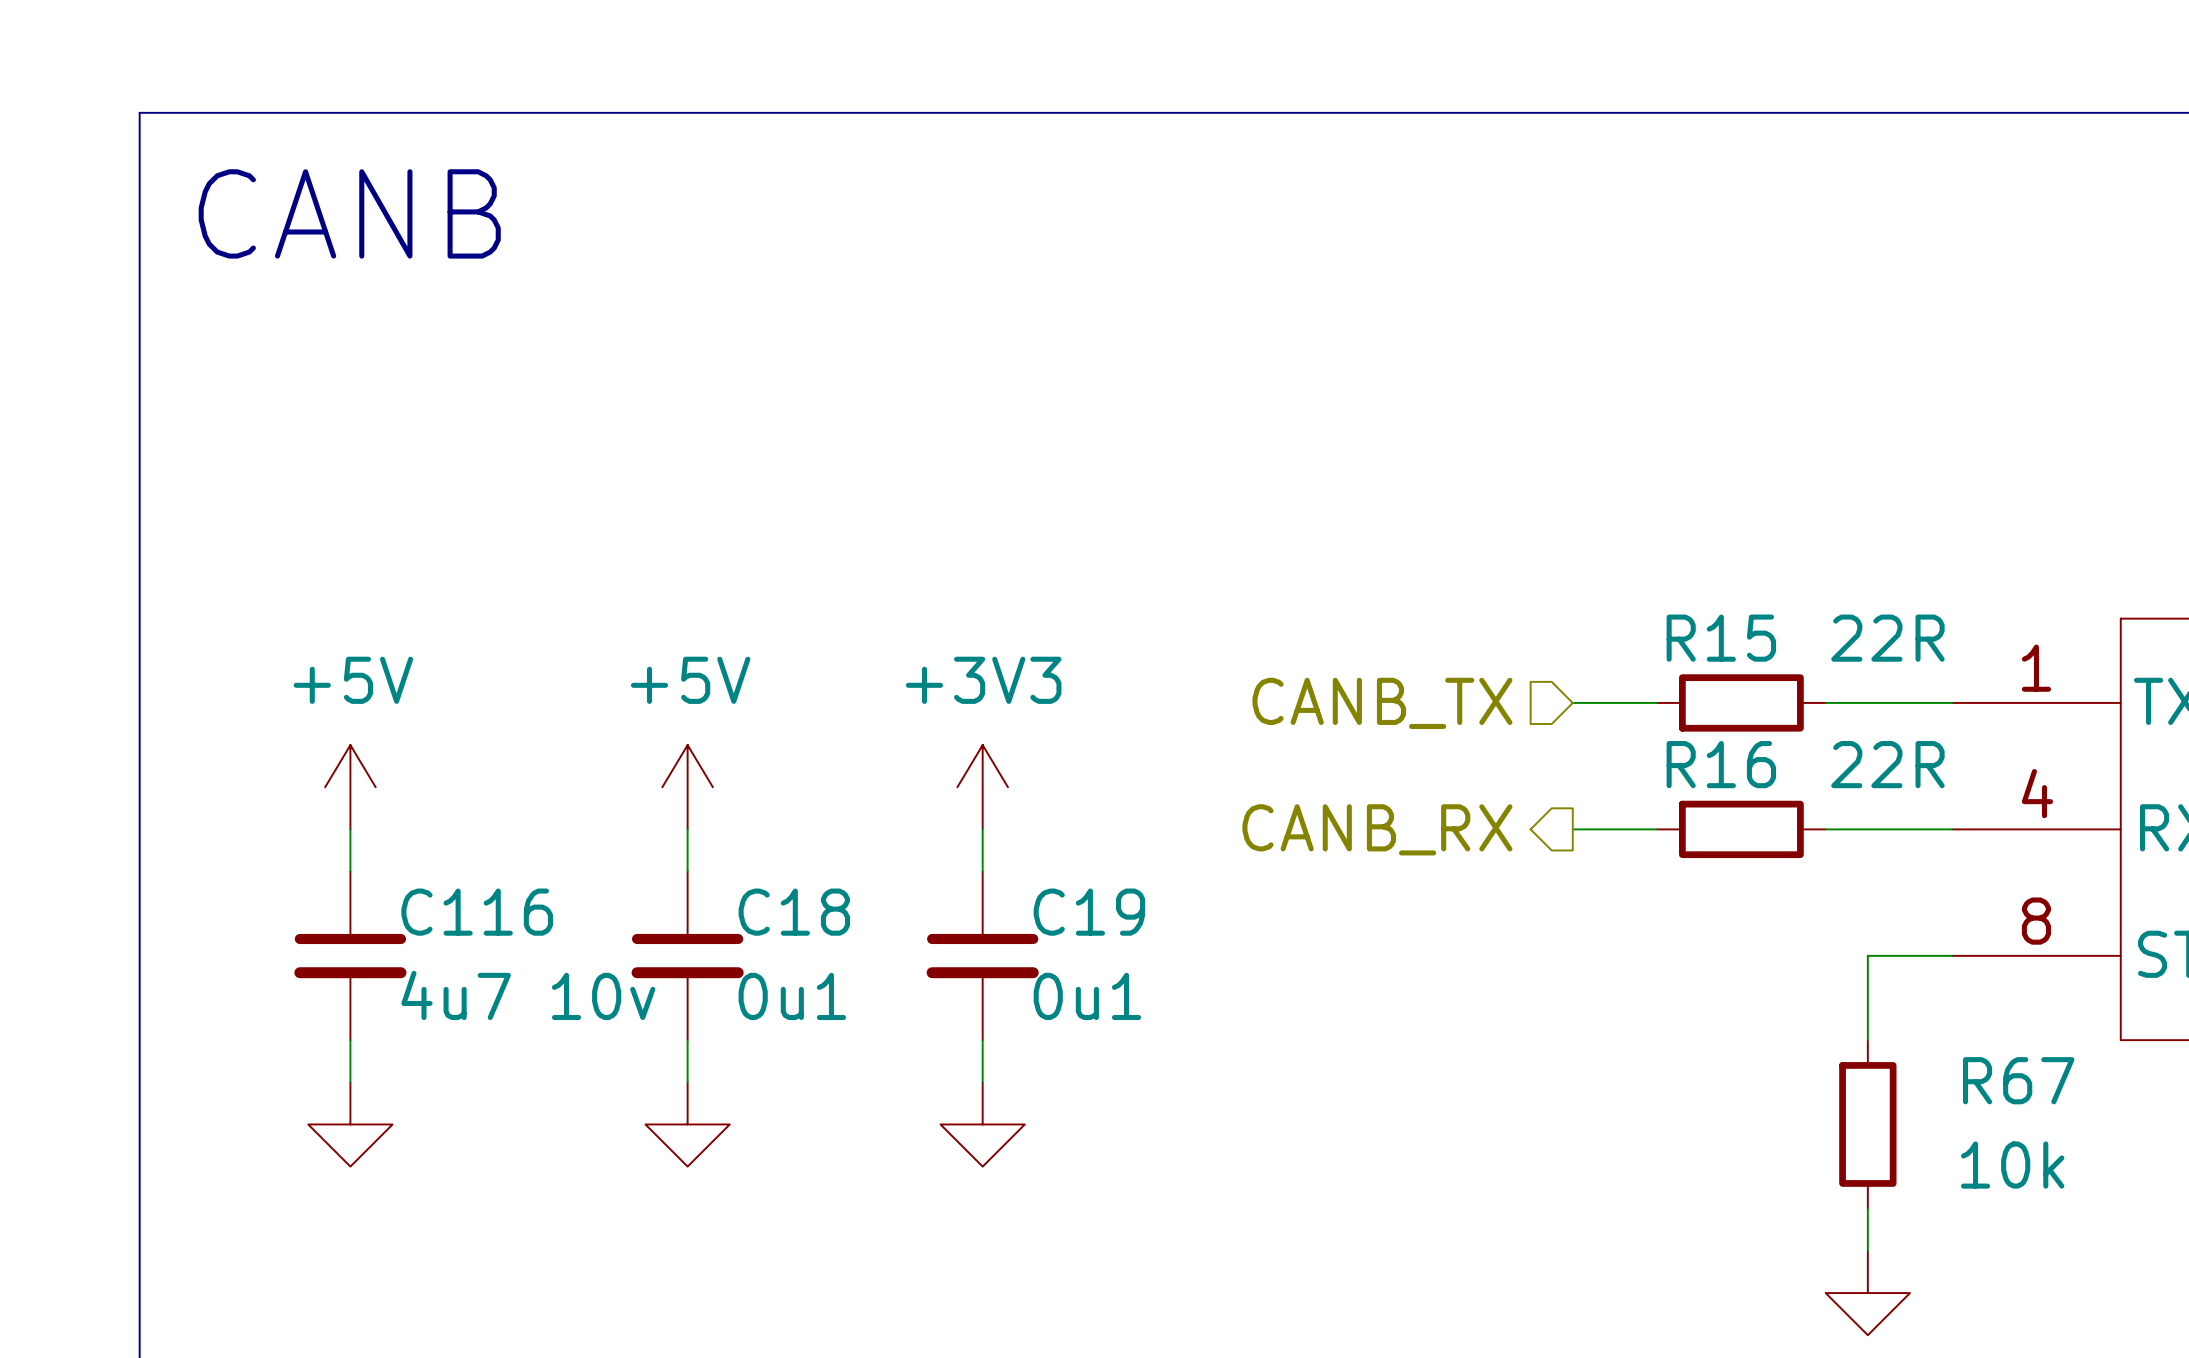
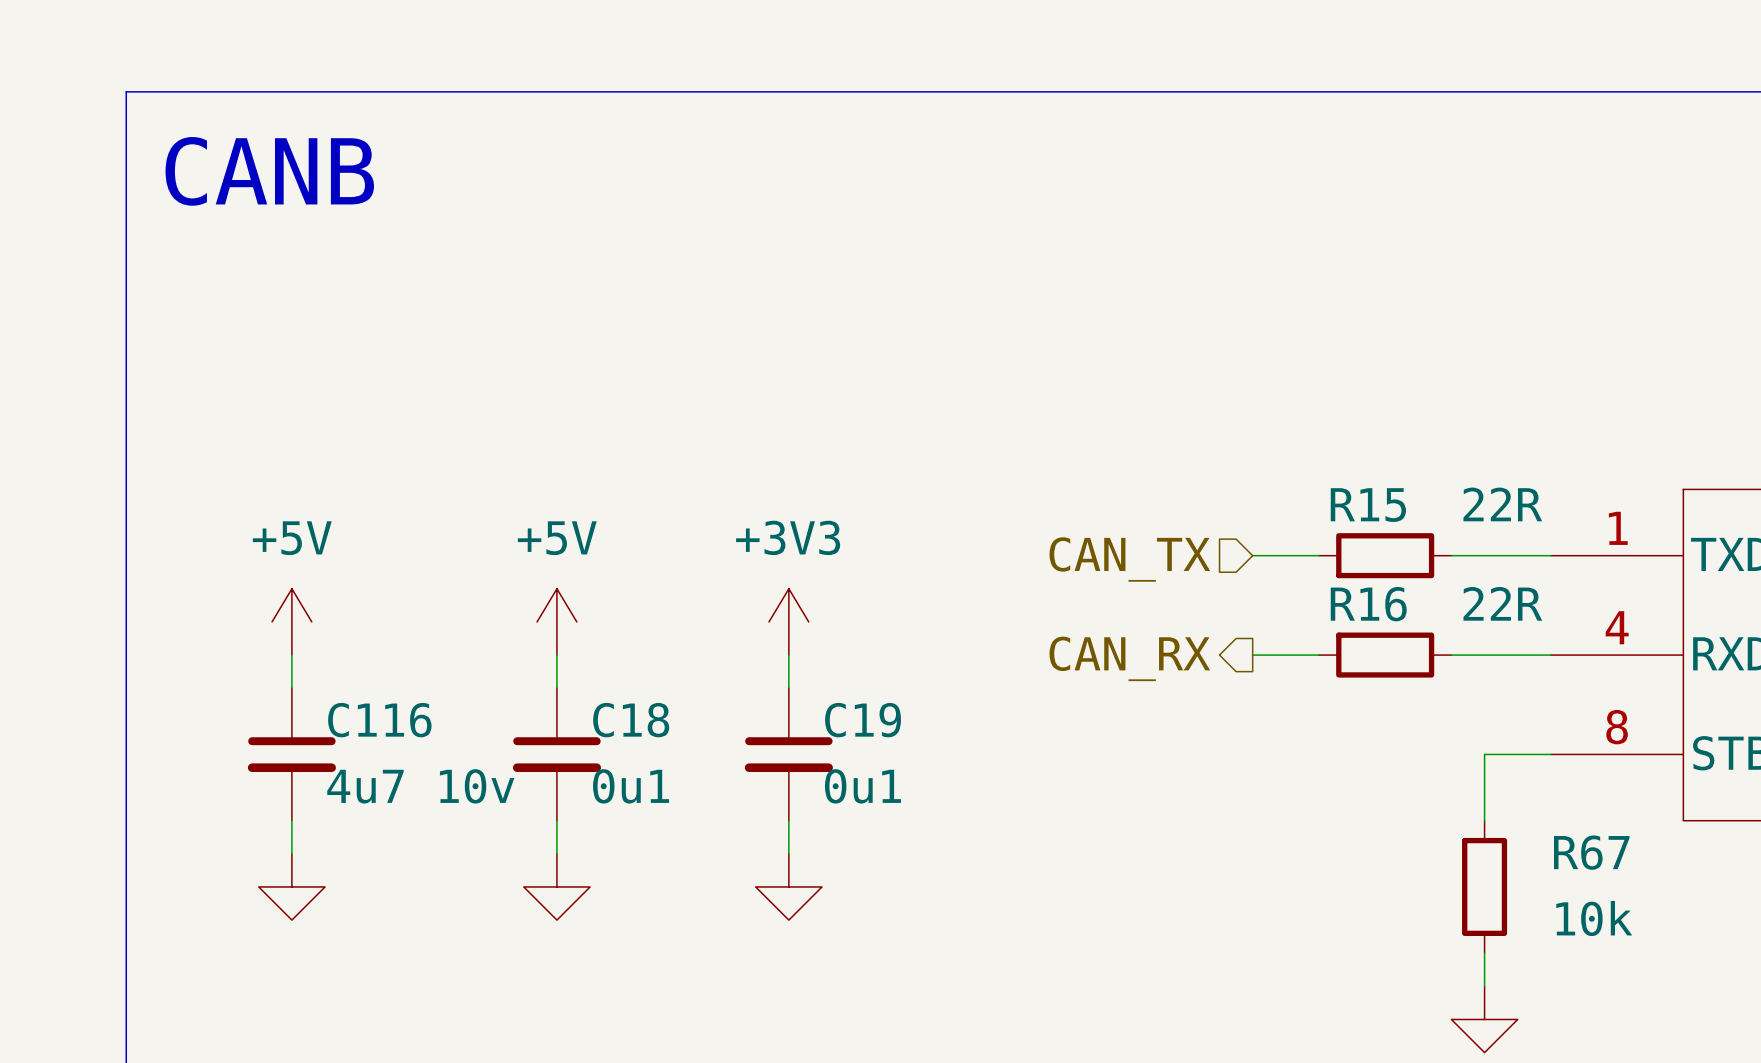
hierarchical label: CANB_TX (1382, 703) -> CAN_TX (1129, 559)
hierarchical label: CANB_RX (1377, 829) -> CAN_RX (1129, 658)

